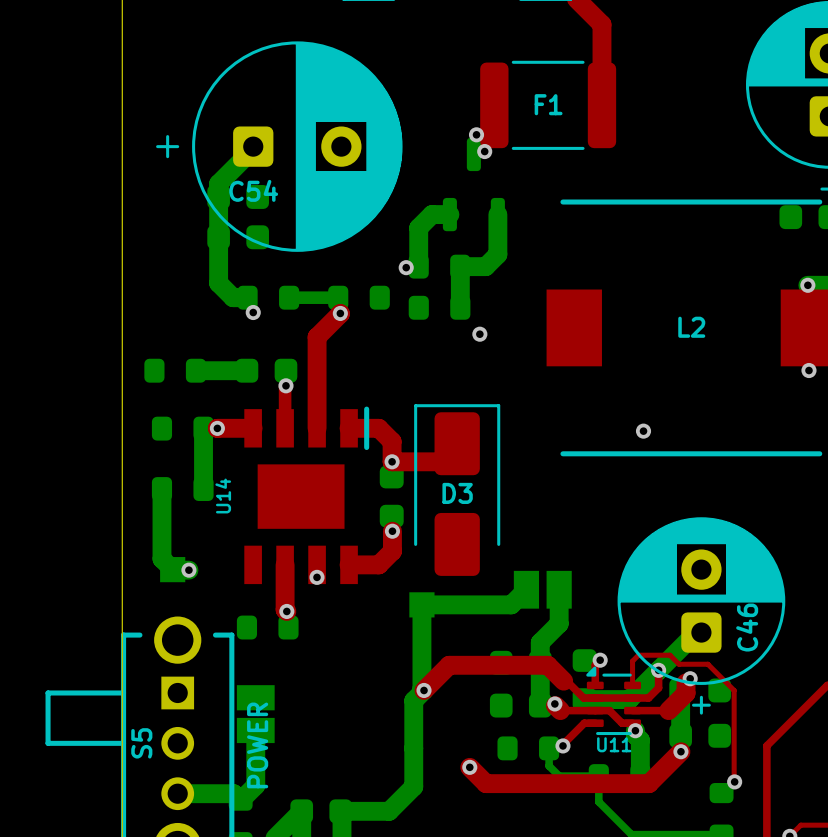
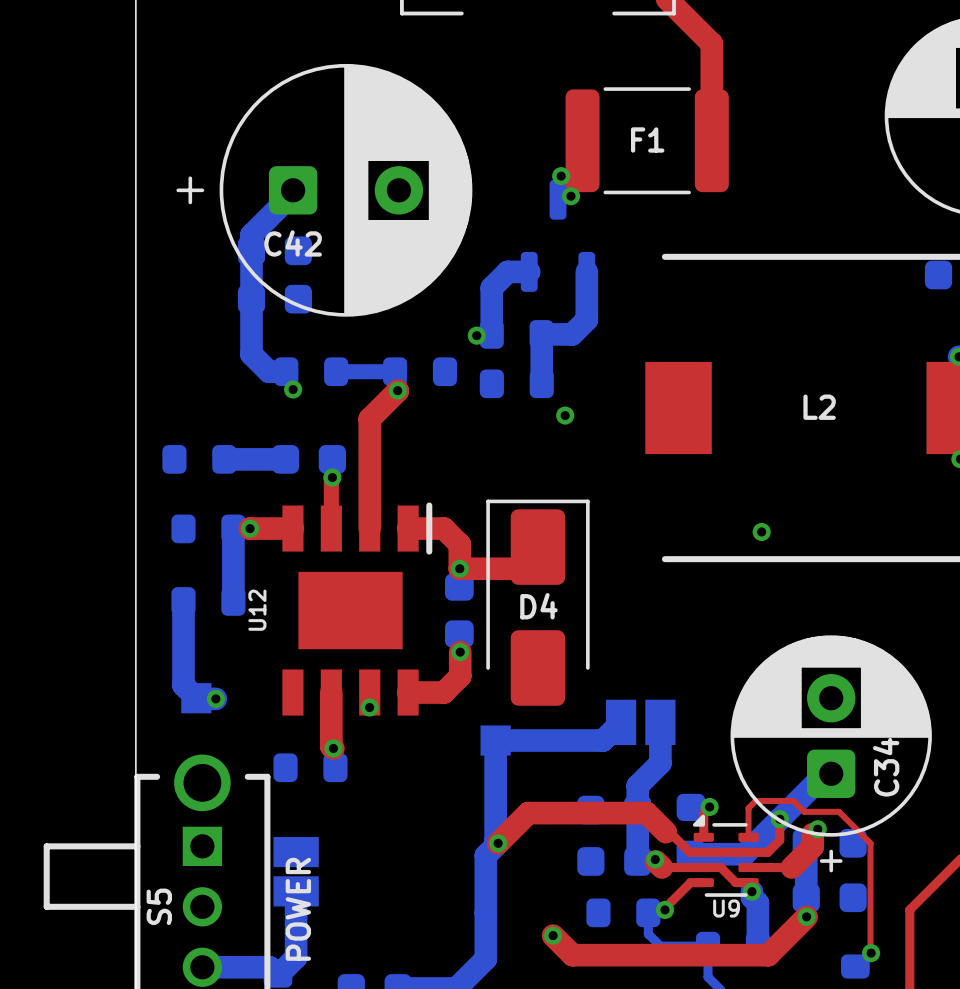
C54 name: C54 (253, 190) -> C42 (293, 243)
D3 name: D3 (457, 493) -> D4 (538, 606)
U14 name: U14 (223, 496) -> U12 (257, 610)
C46 name: C46 (747, 627) -> C34 (886, 767)
U11 name: U11 (614, 744) -> U9 (726, 908)

